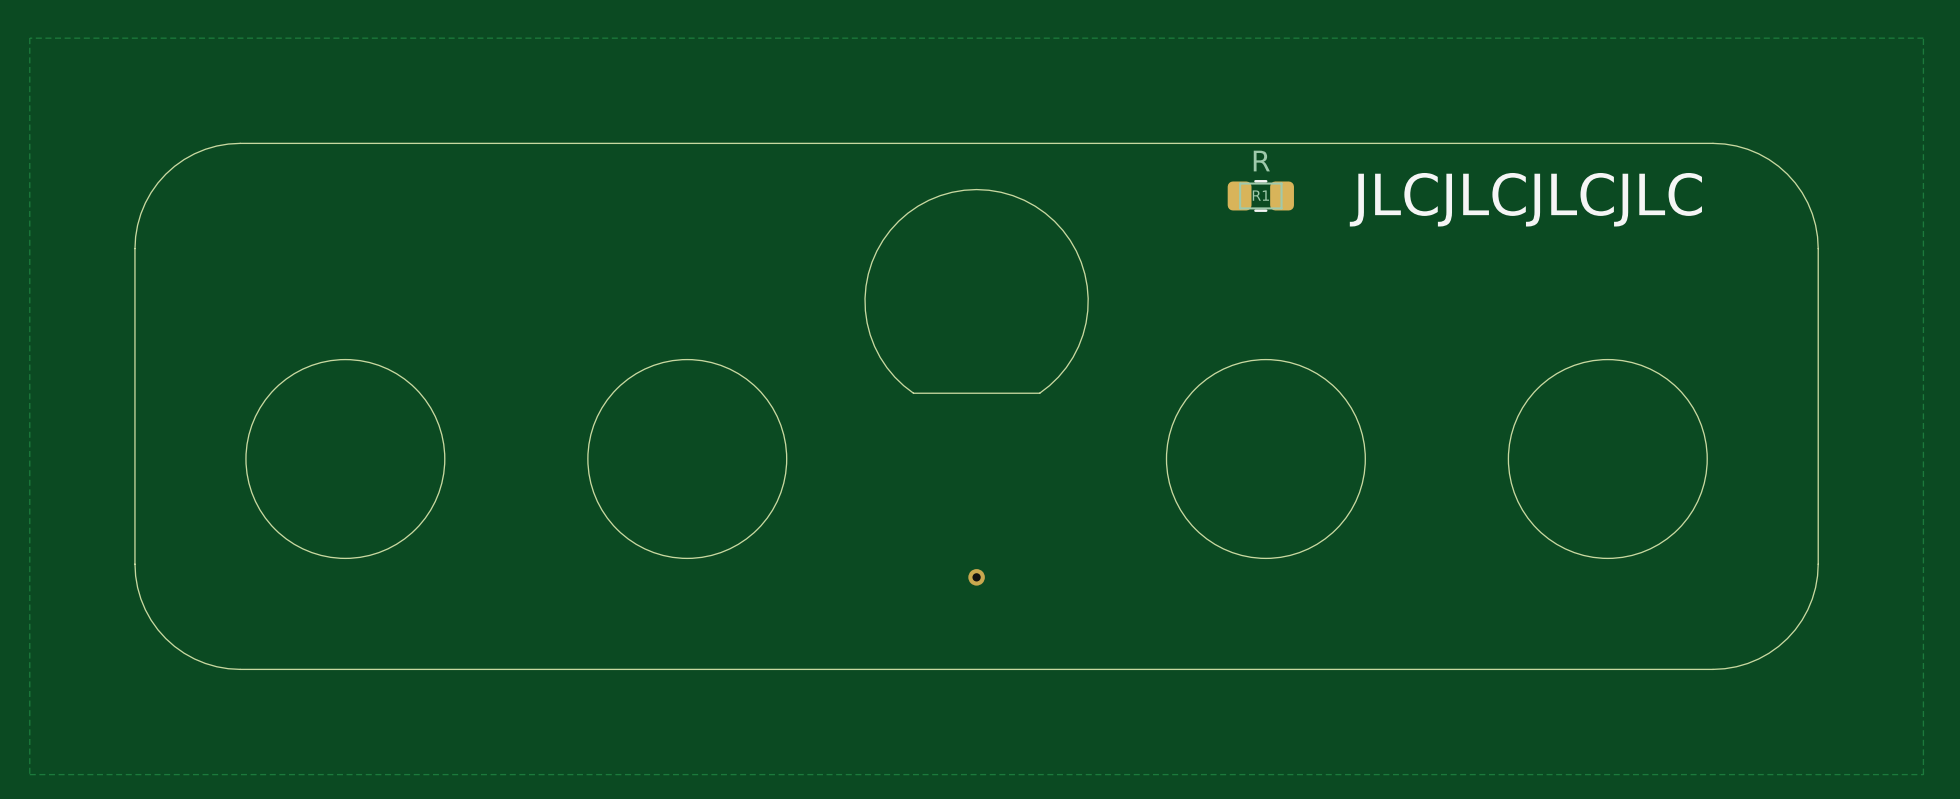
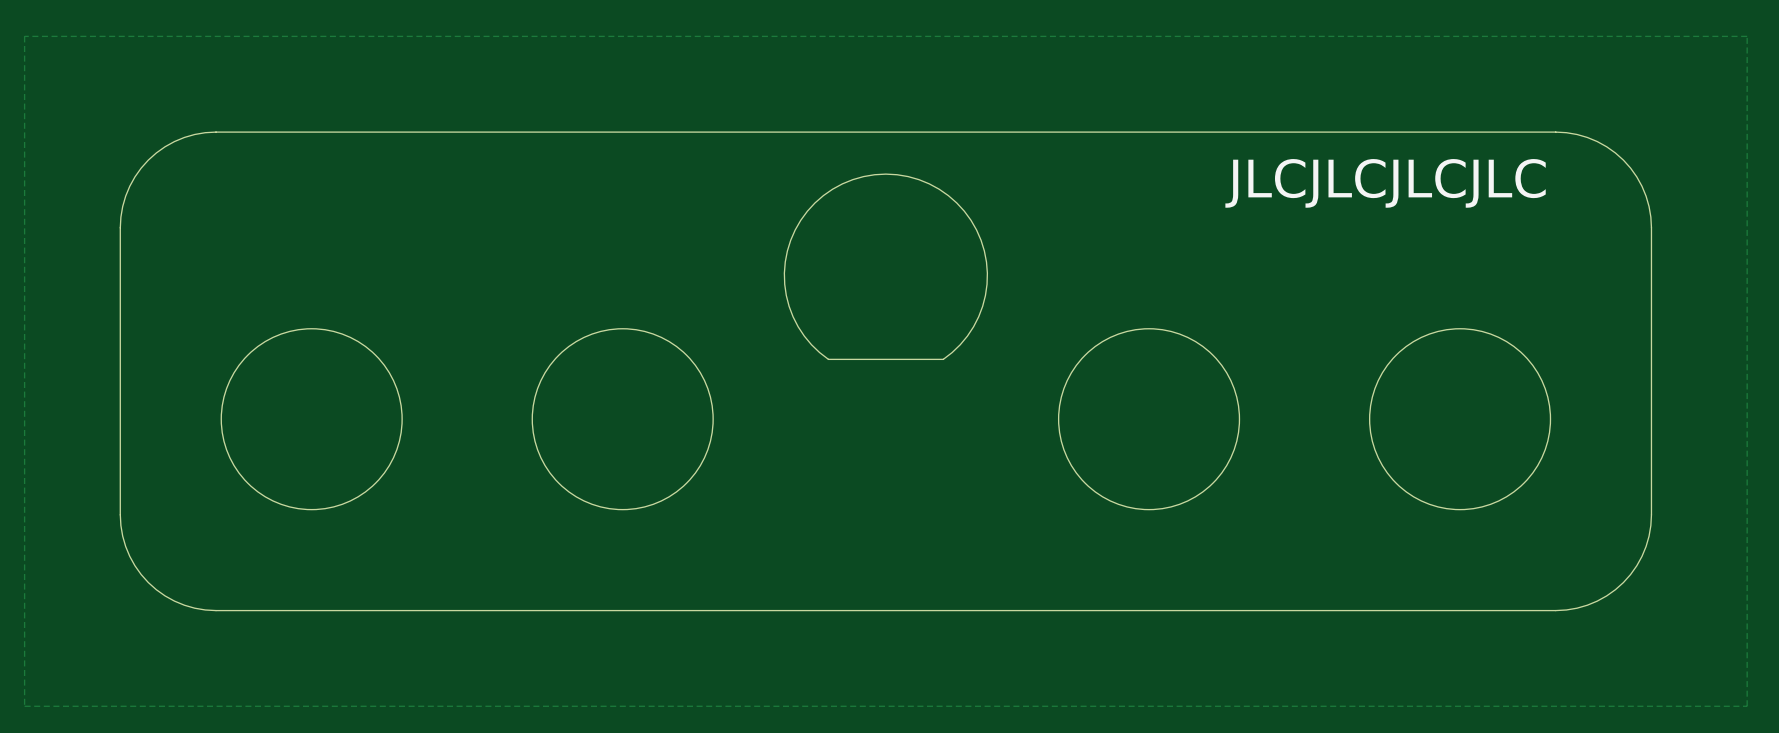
R1: R (1260, 195) -> none
via: (976, 577) -> none

